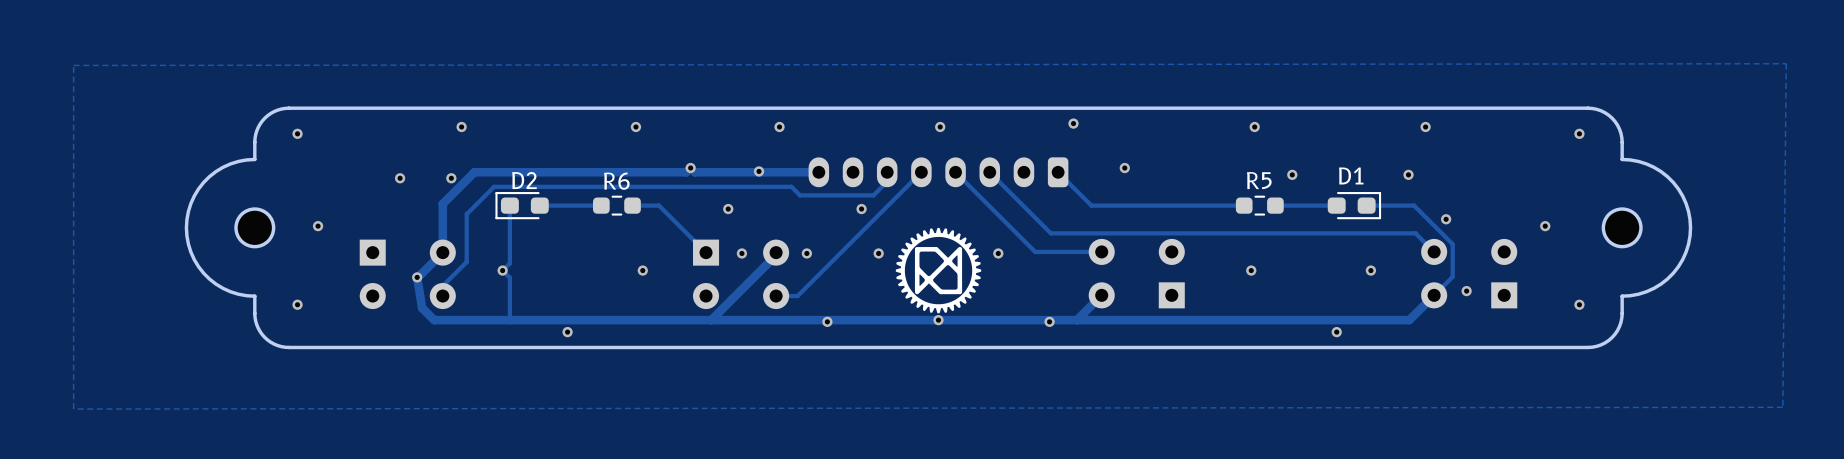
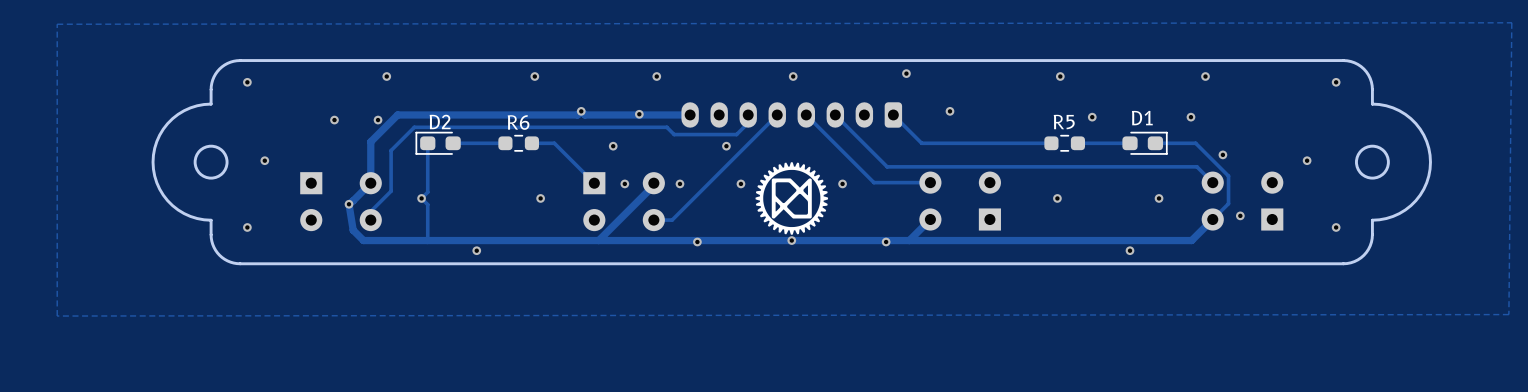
part: (254, 227) -> none
part: (1622, 227) -> none

